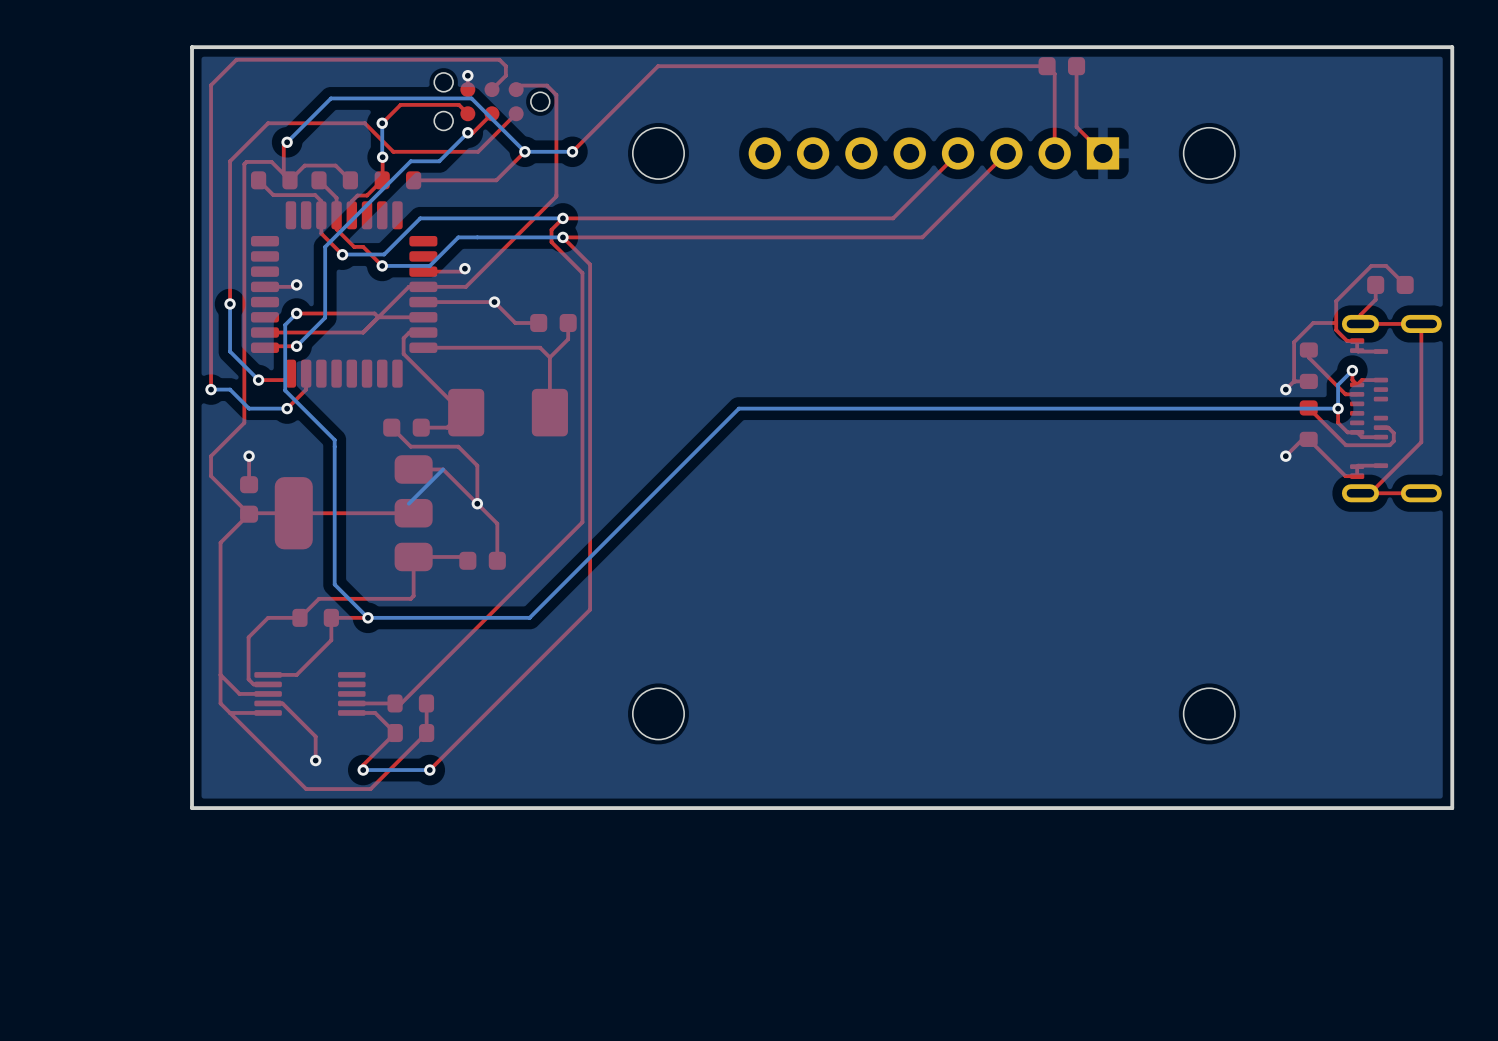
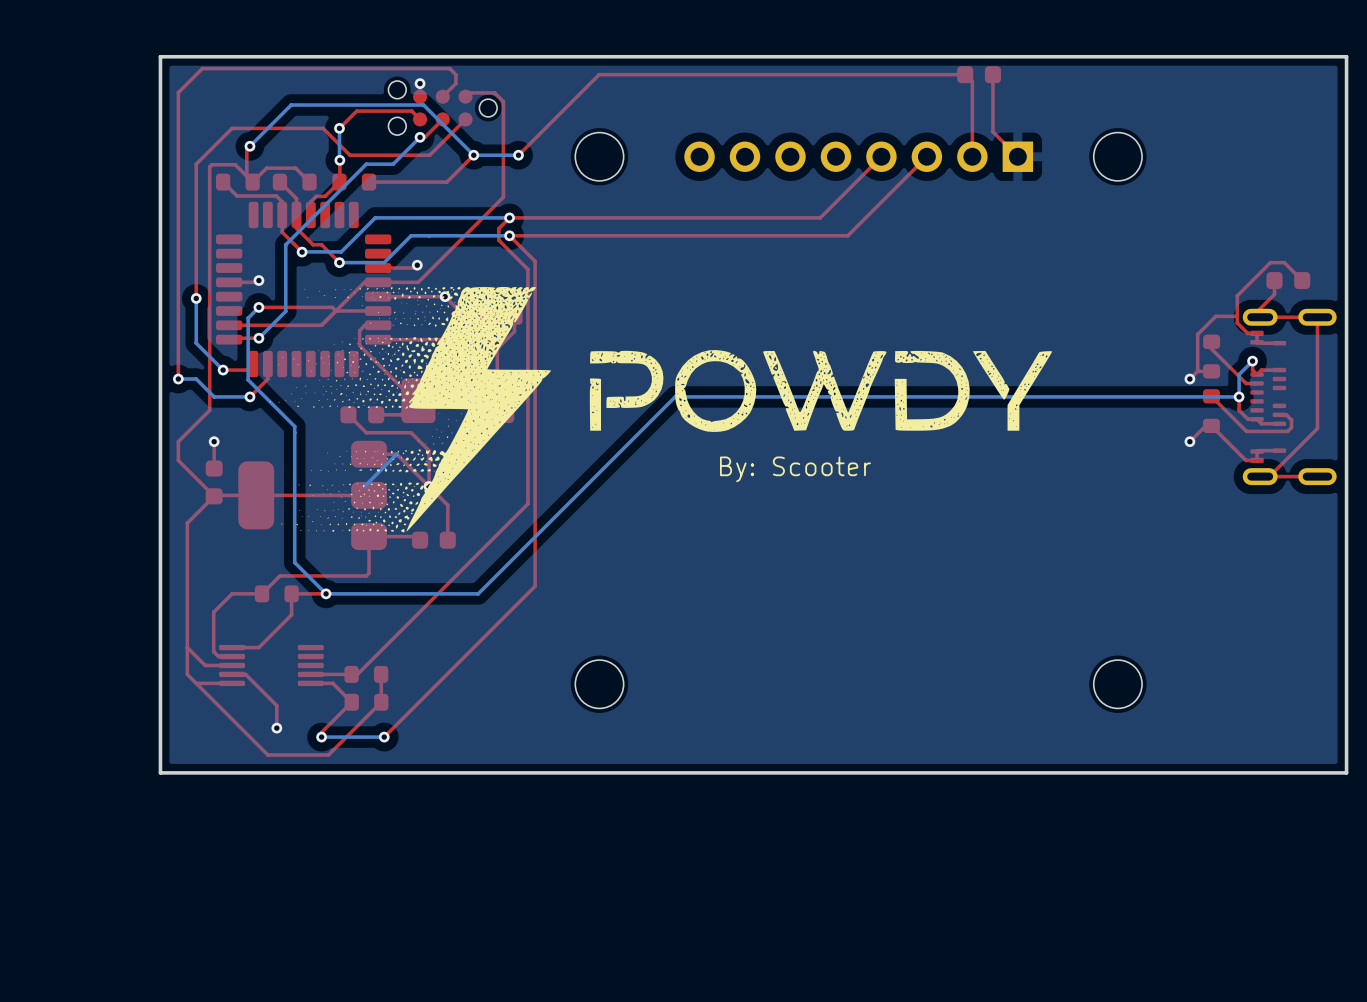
drawing: none -> [269, 286, 1053, 533]
text: none -> By: Scooter (795, 469)

